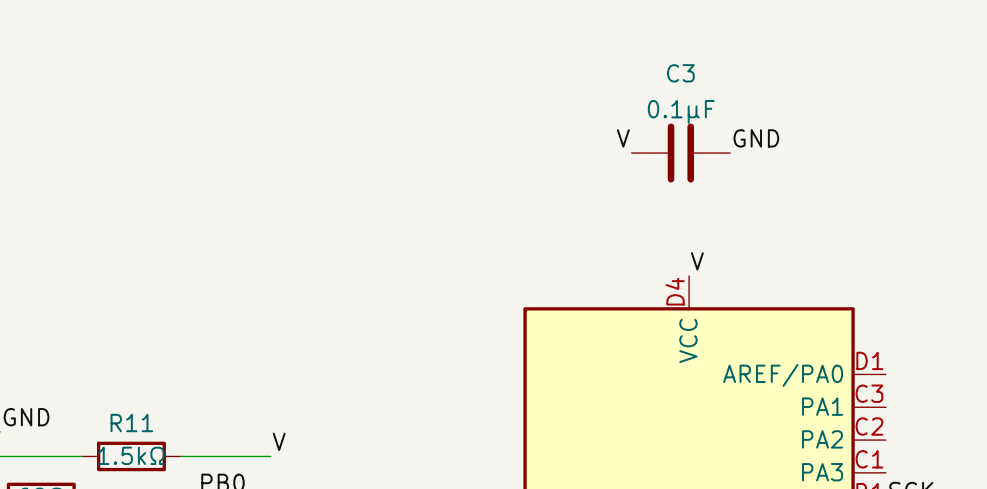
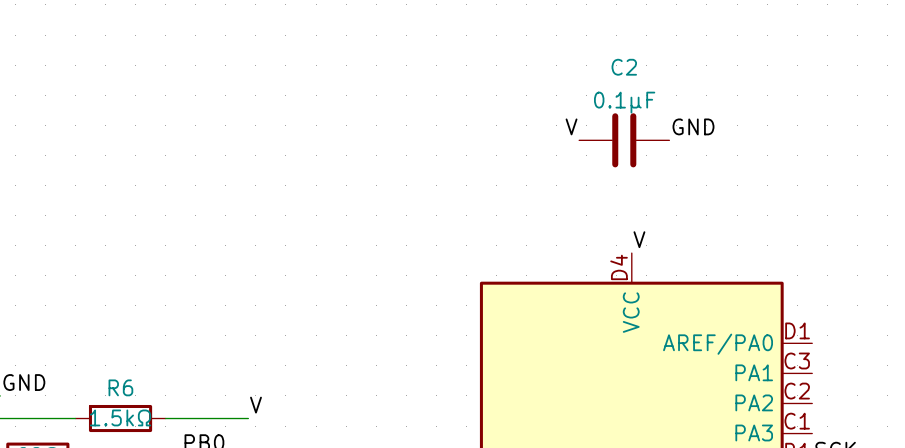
C3 name: C3 (680, 73) -> C2 (624, 67)
R11 name: R11 (131, 423) -> R6 (120, 387)

